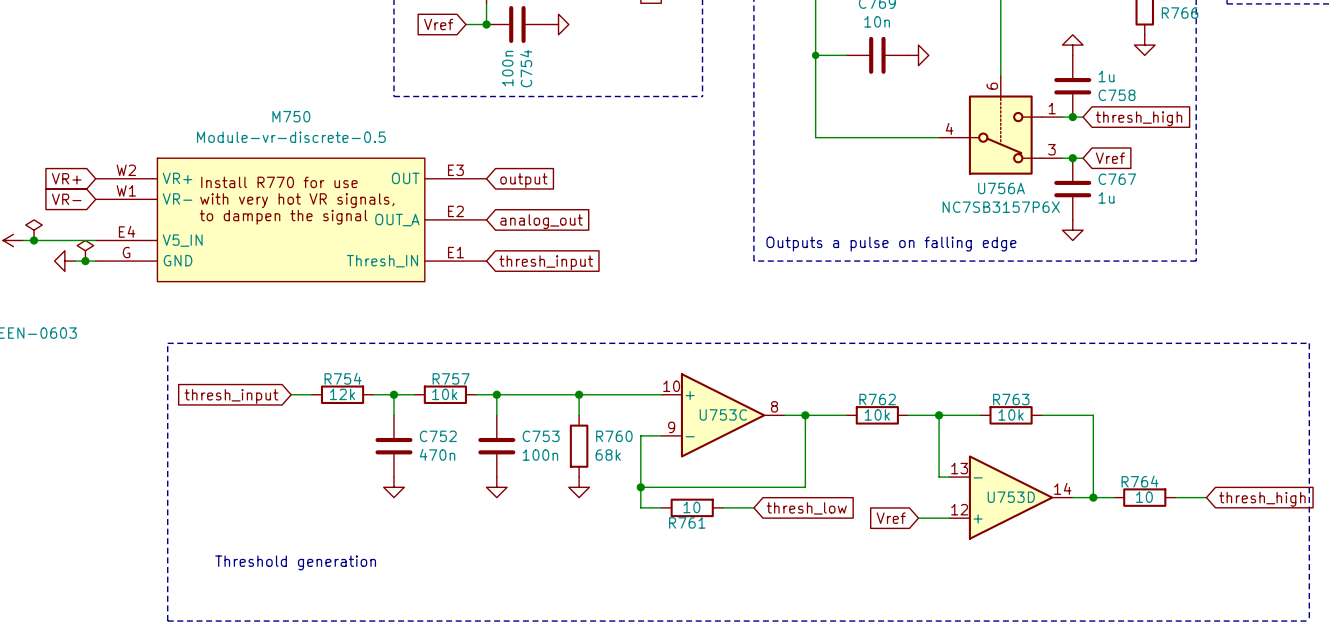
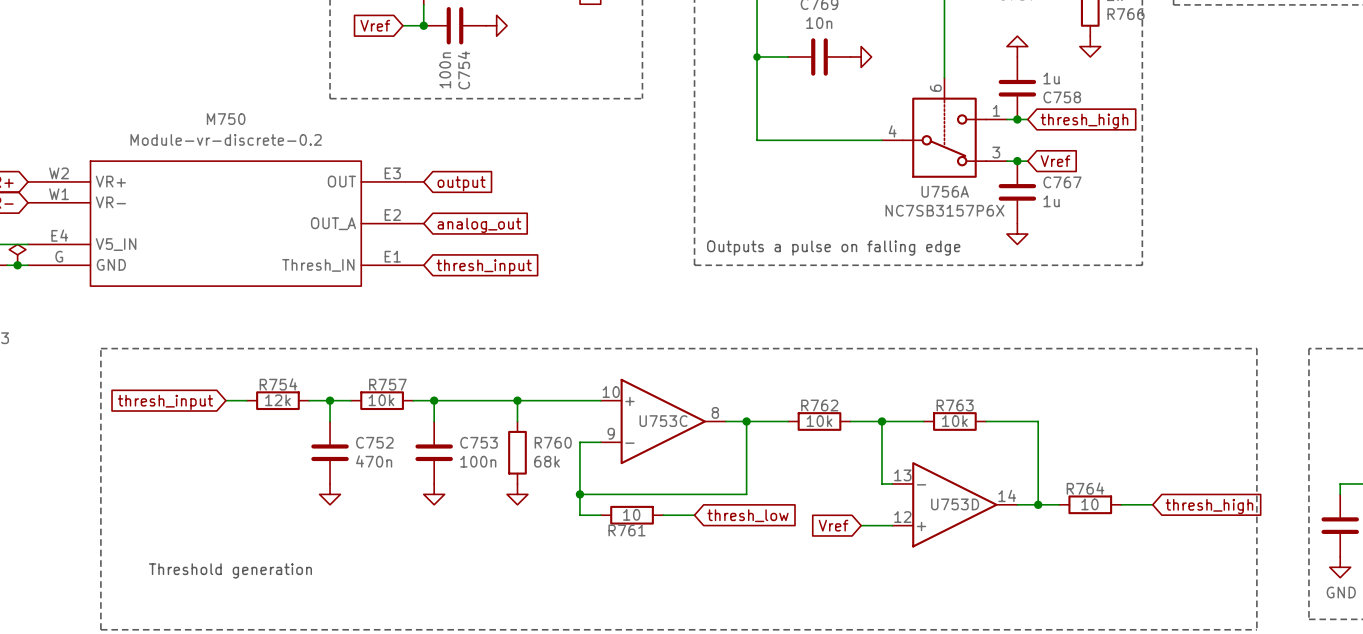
M750 value: Module-vr-discrete-0.5 (291, 137) -> Module-vr-discrete-0.2 (226, 139)
M750 text: Install R770 for use (279, 182) -> none
M750 text: with very hot VR signals, (297, 200) -> none
M750 text: to dampen the signal (283, 217) -> none

